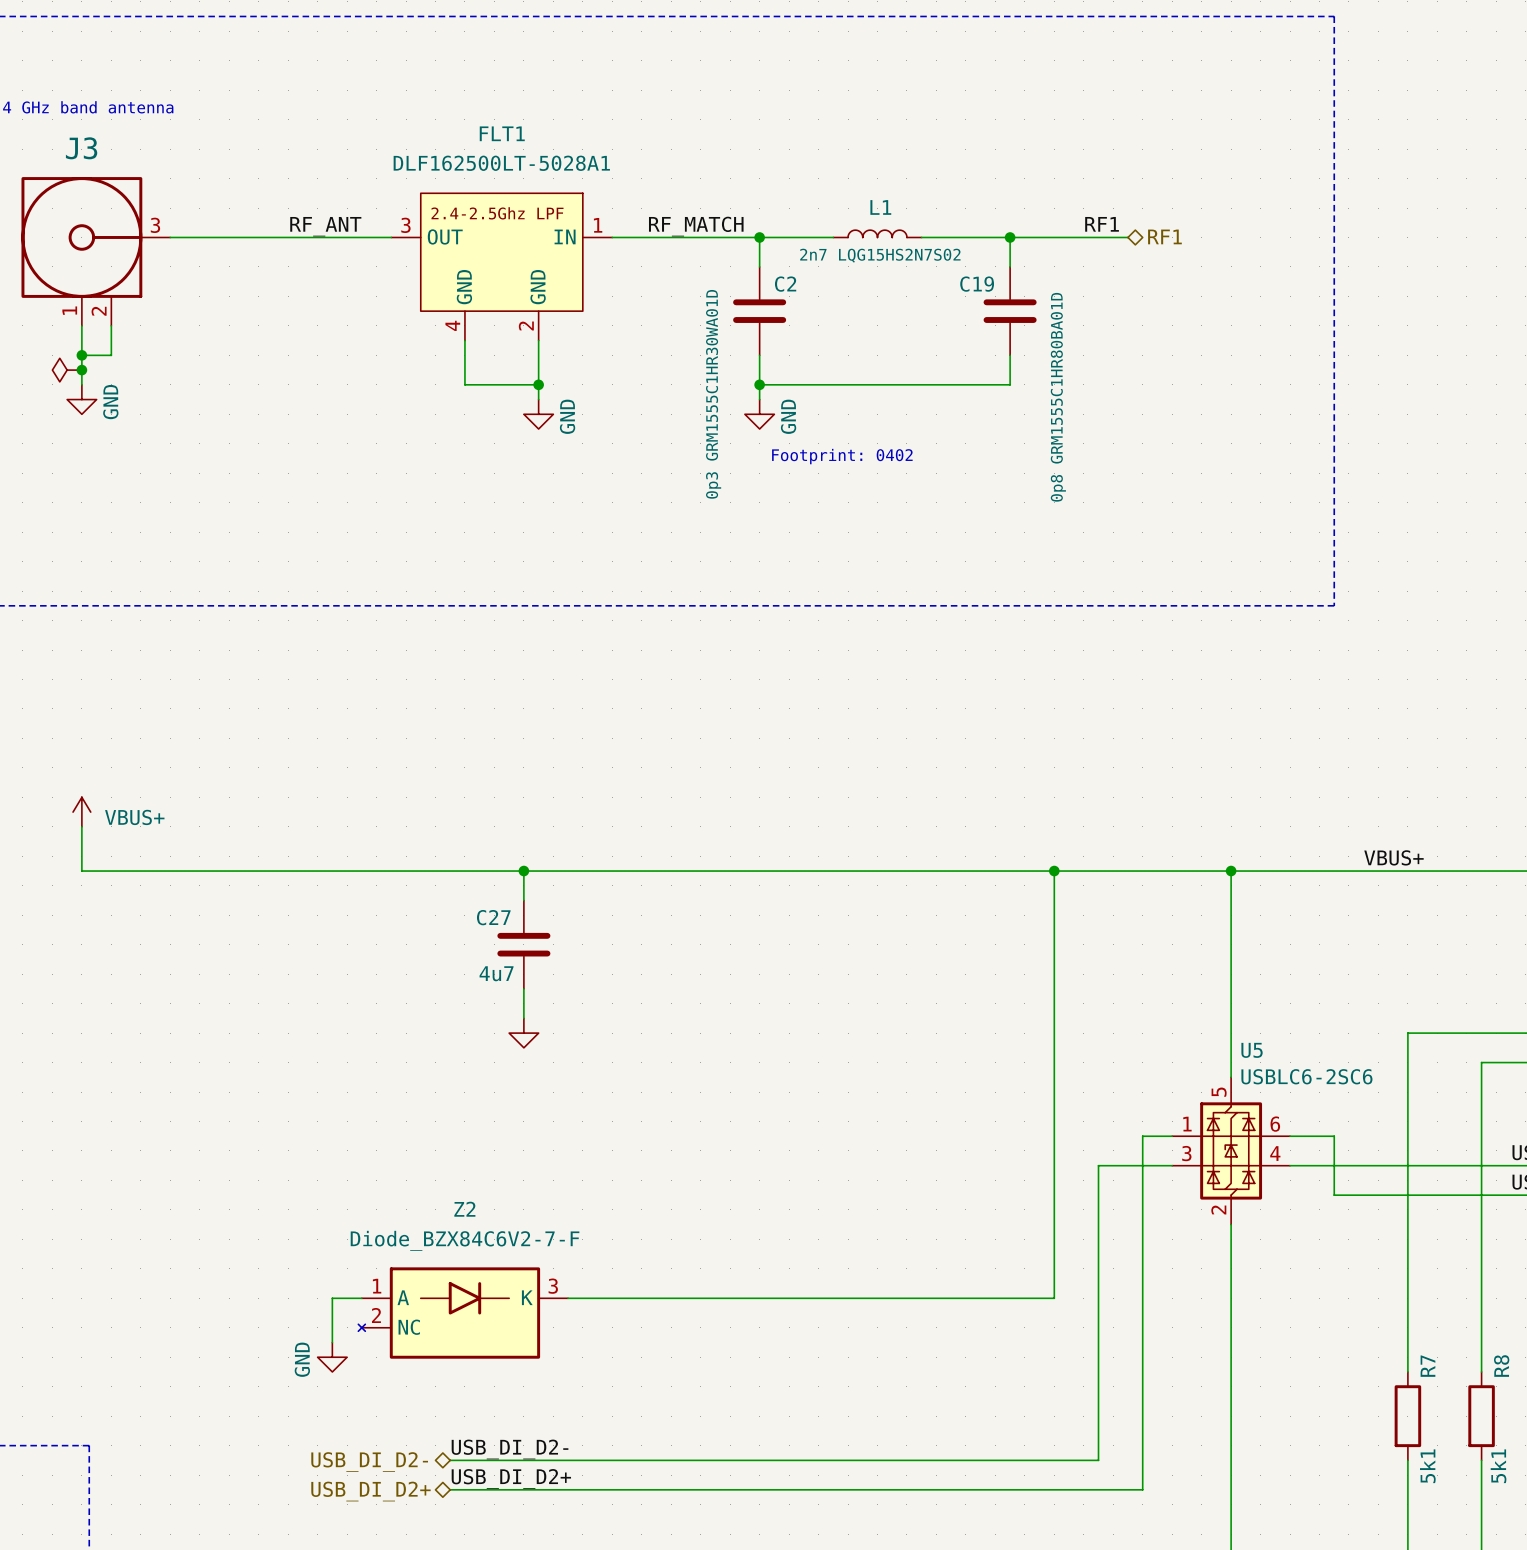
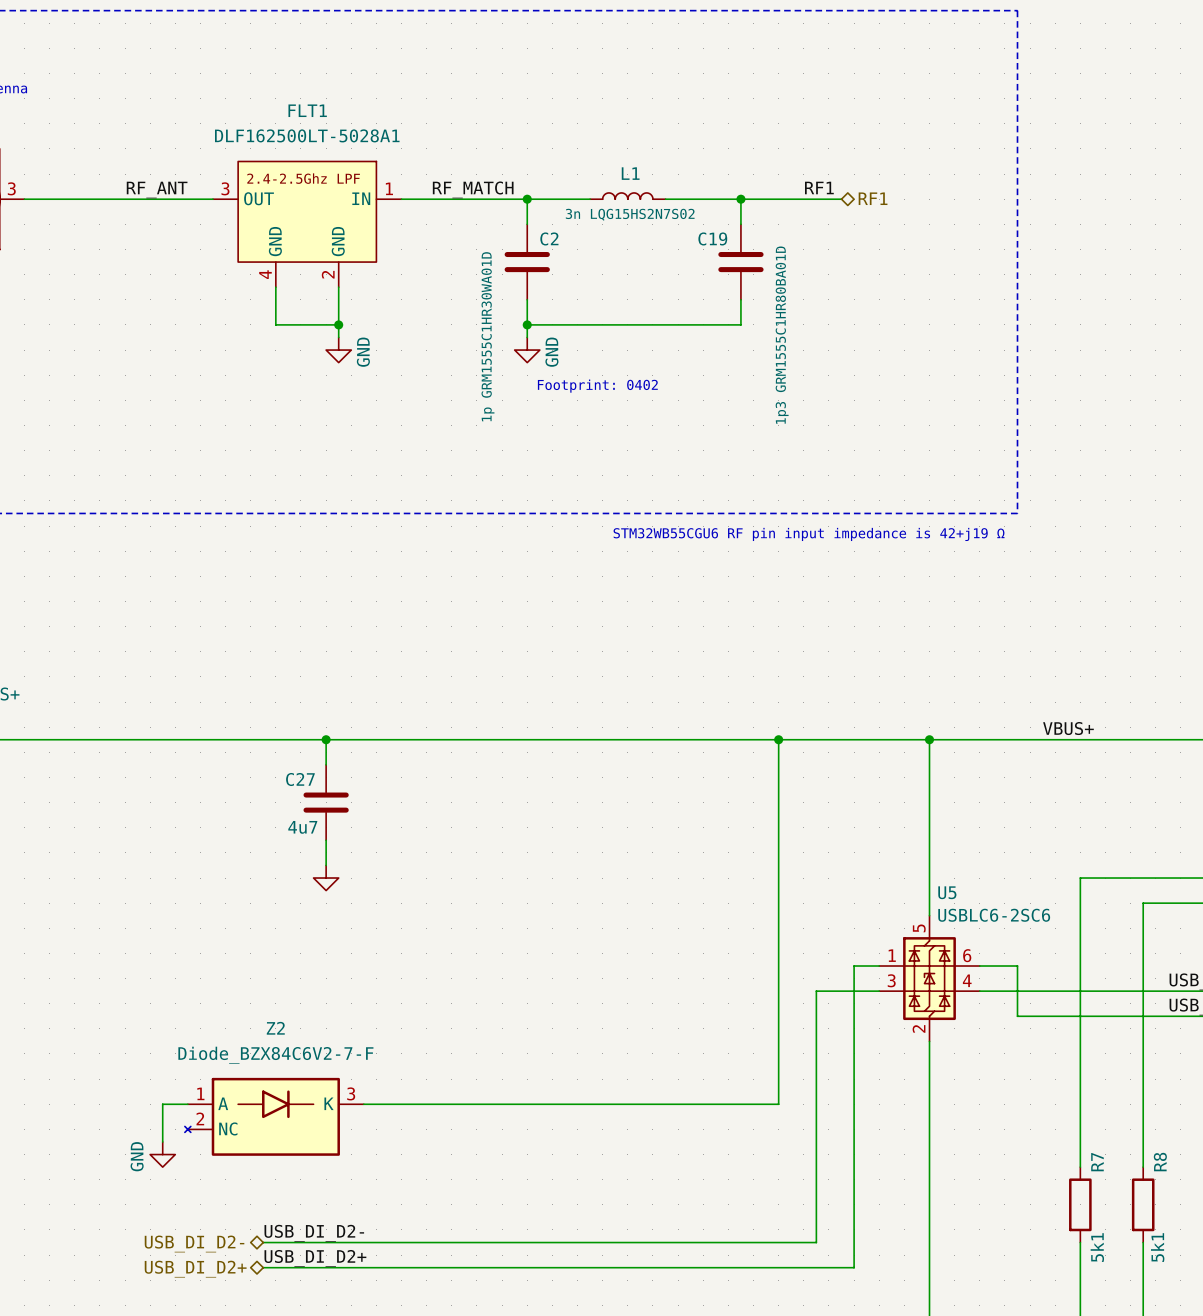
L1 value: 2n7 LQG15HS2N7S02 (880, 255) -> 3n LQG15HS2N7S02 (630, 214)
C2 value: 0p3 GRM1555C1HR30WA01D (713, 394) -> 1p GRM1555C1HR30WA01D (487, 336)
C19 value: 0p8 GRM1555C1HR80BA01D (1058, 397) -> 1p3 GRM1555C1HR80BA01D (782, 335)
text: none -> STM32WB55CGU6 RF pin input impedance is 42+j19 Ω (809, 534)

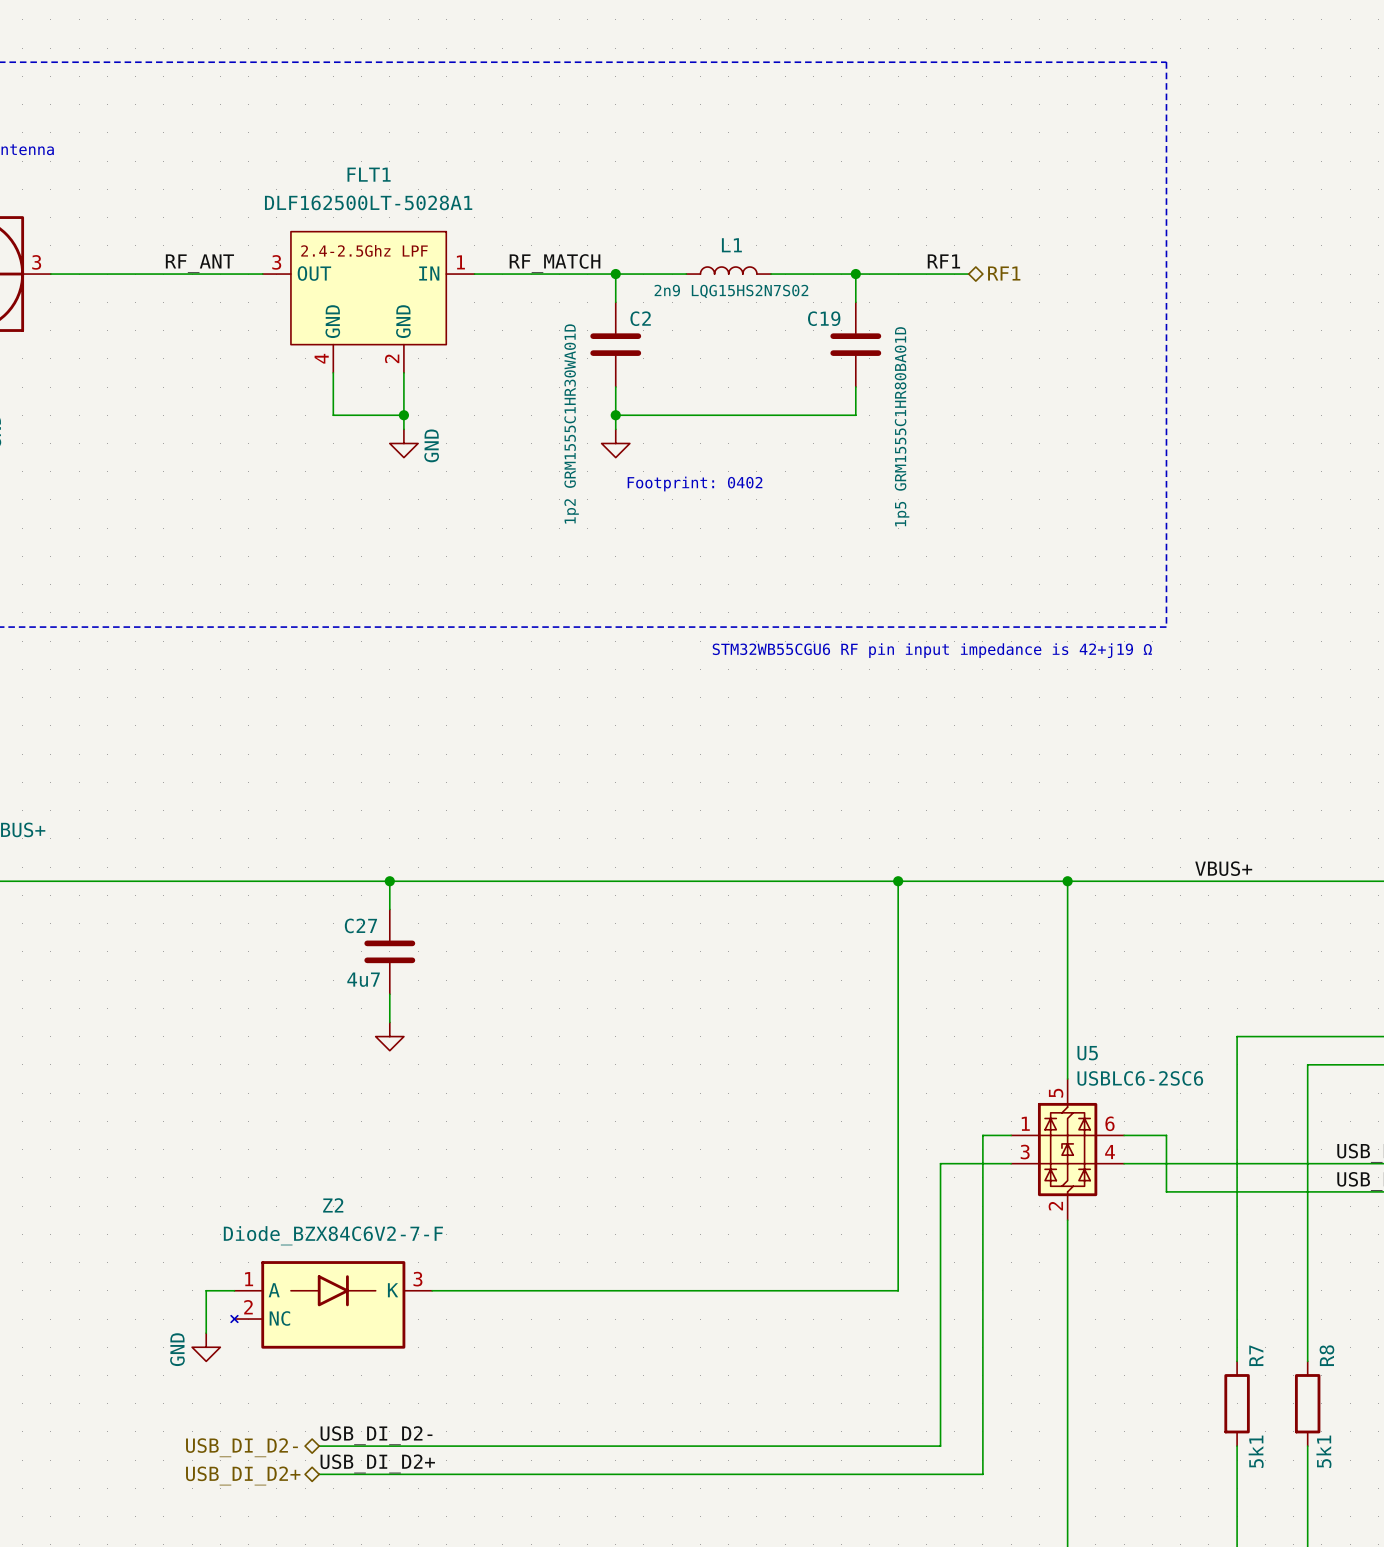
L1 value: 3n LQG15HS2N7S02 (630, 214) -> 2n9 LQG15HS2N7S02 (731, 291)
C19 value: 1p3 GRM1555C1HR80BA01D (782, 335) -> 1p5 GRM1555C1HR80BA01D (902, 426)
C2 value: 1p GRM1555C1HR30WA01D (487, 336) -> 1p2 GRM1555C1HR30WA01D (571, 423)
power symbol text: GND (551, 352) -> none

